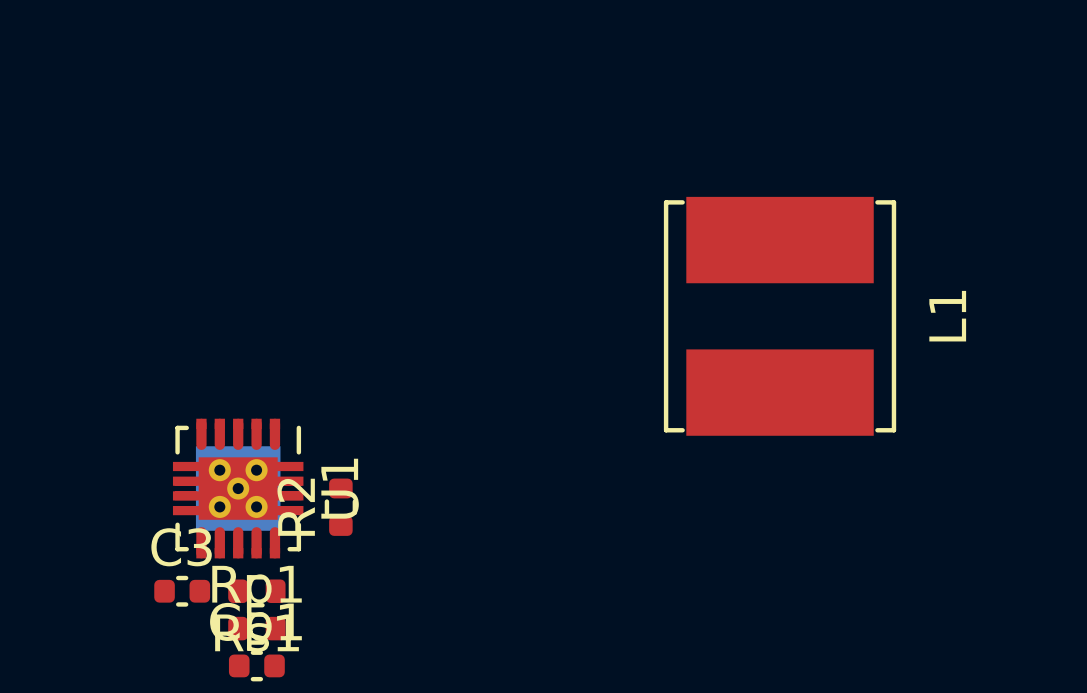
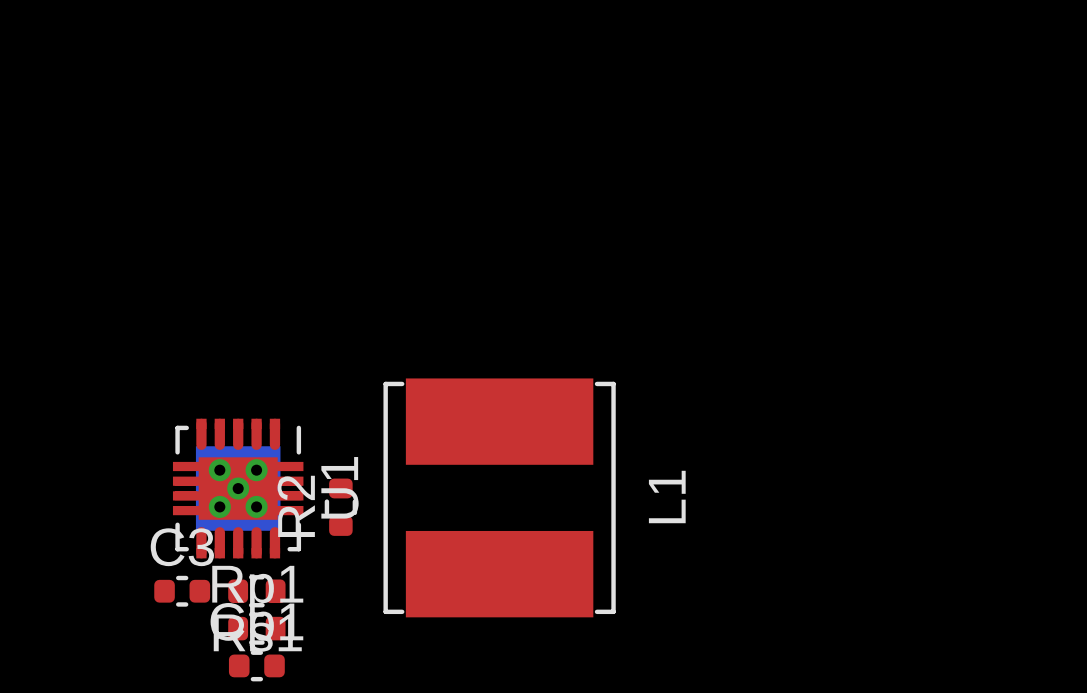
L1 position: (780, 316) -> (499, 497)

